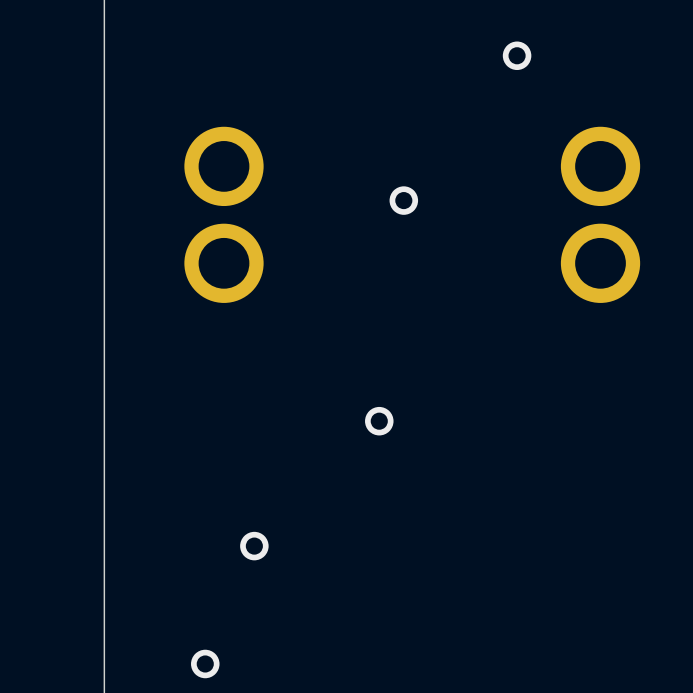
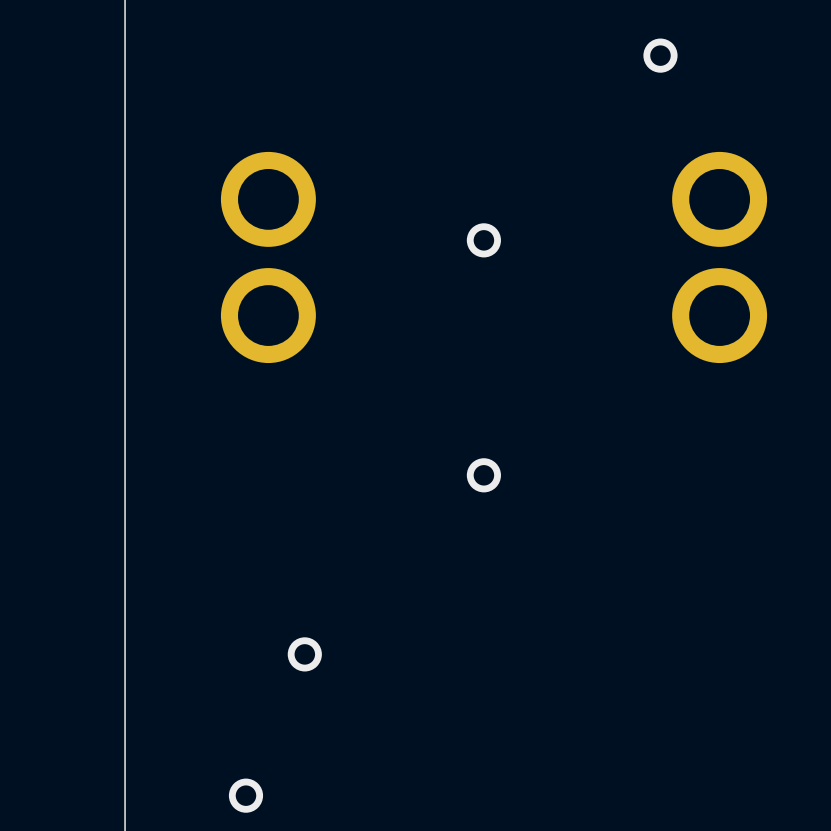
via position: (517, 55) -> (660, 55)
via position: (379, 421) -> (483, 475)

